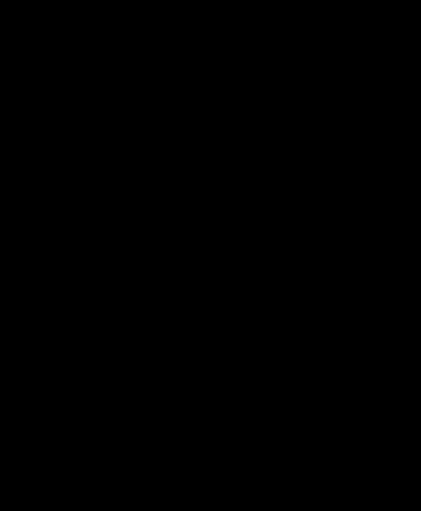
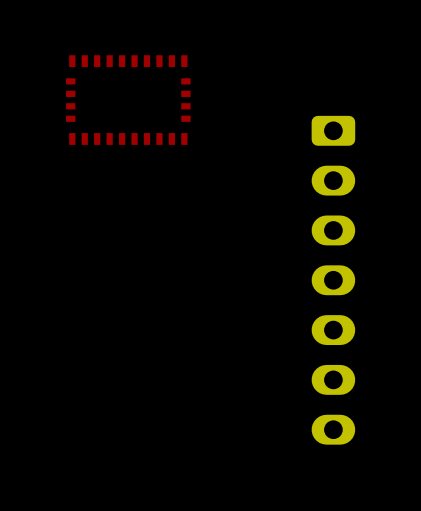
part: none -> (128, 100)
part: none -> (333, 280)

